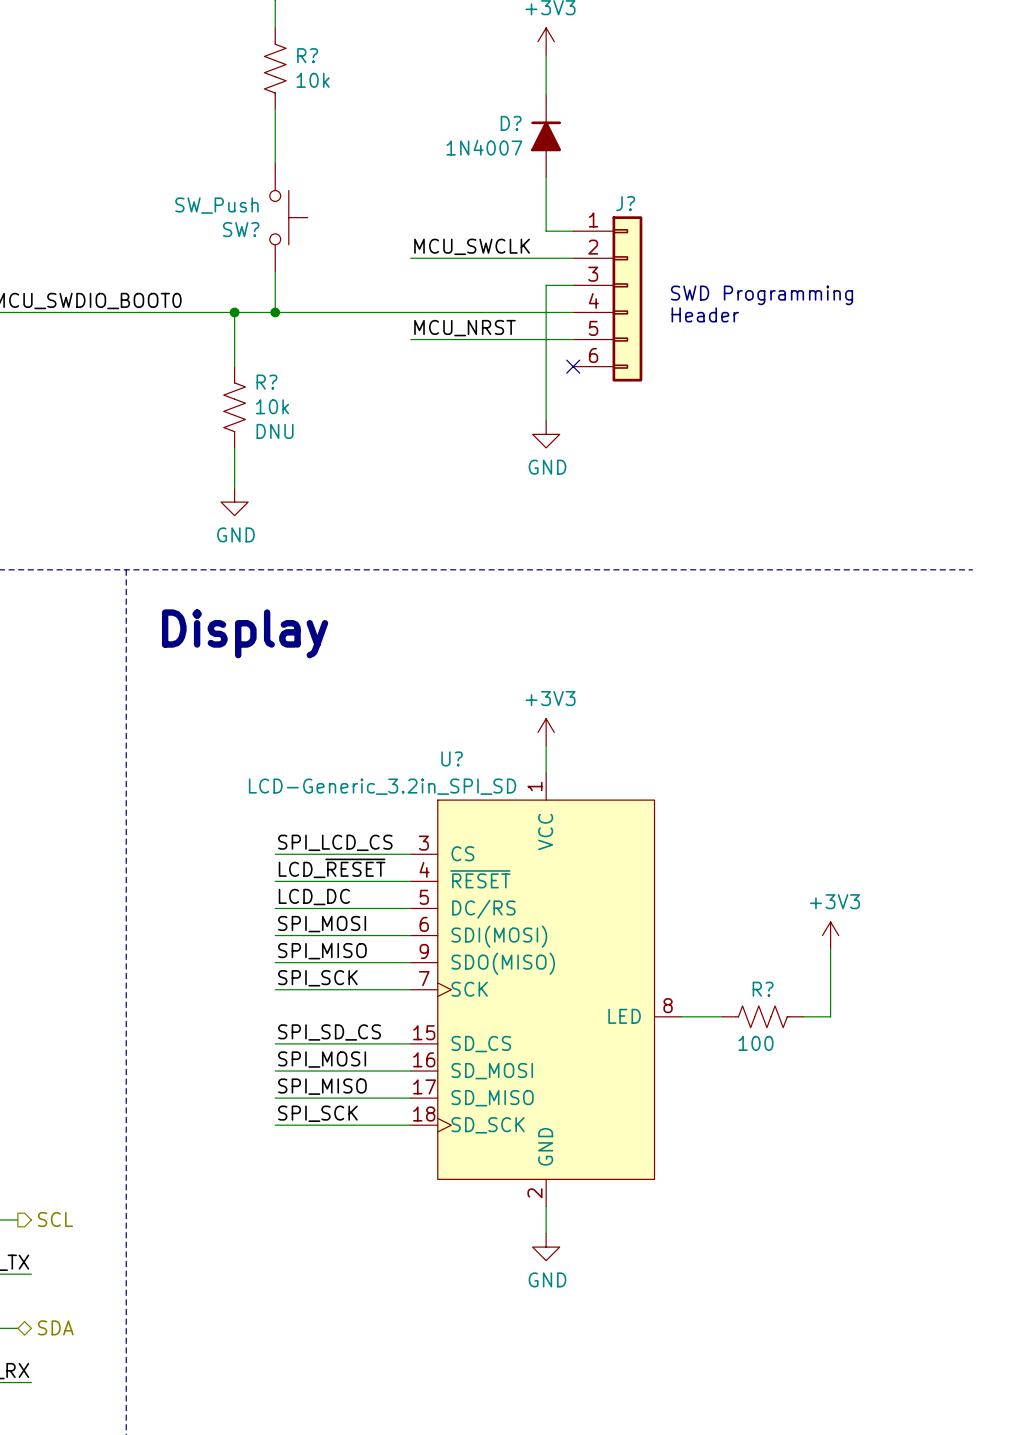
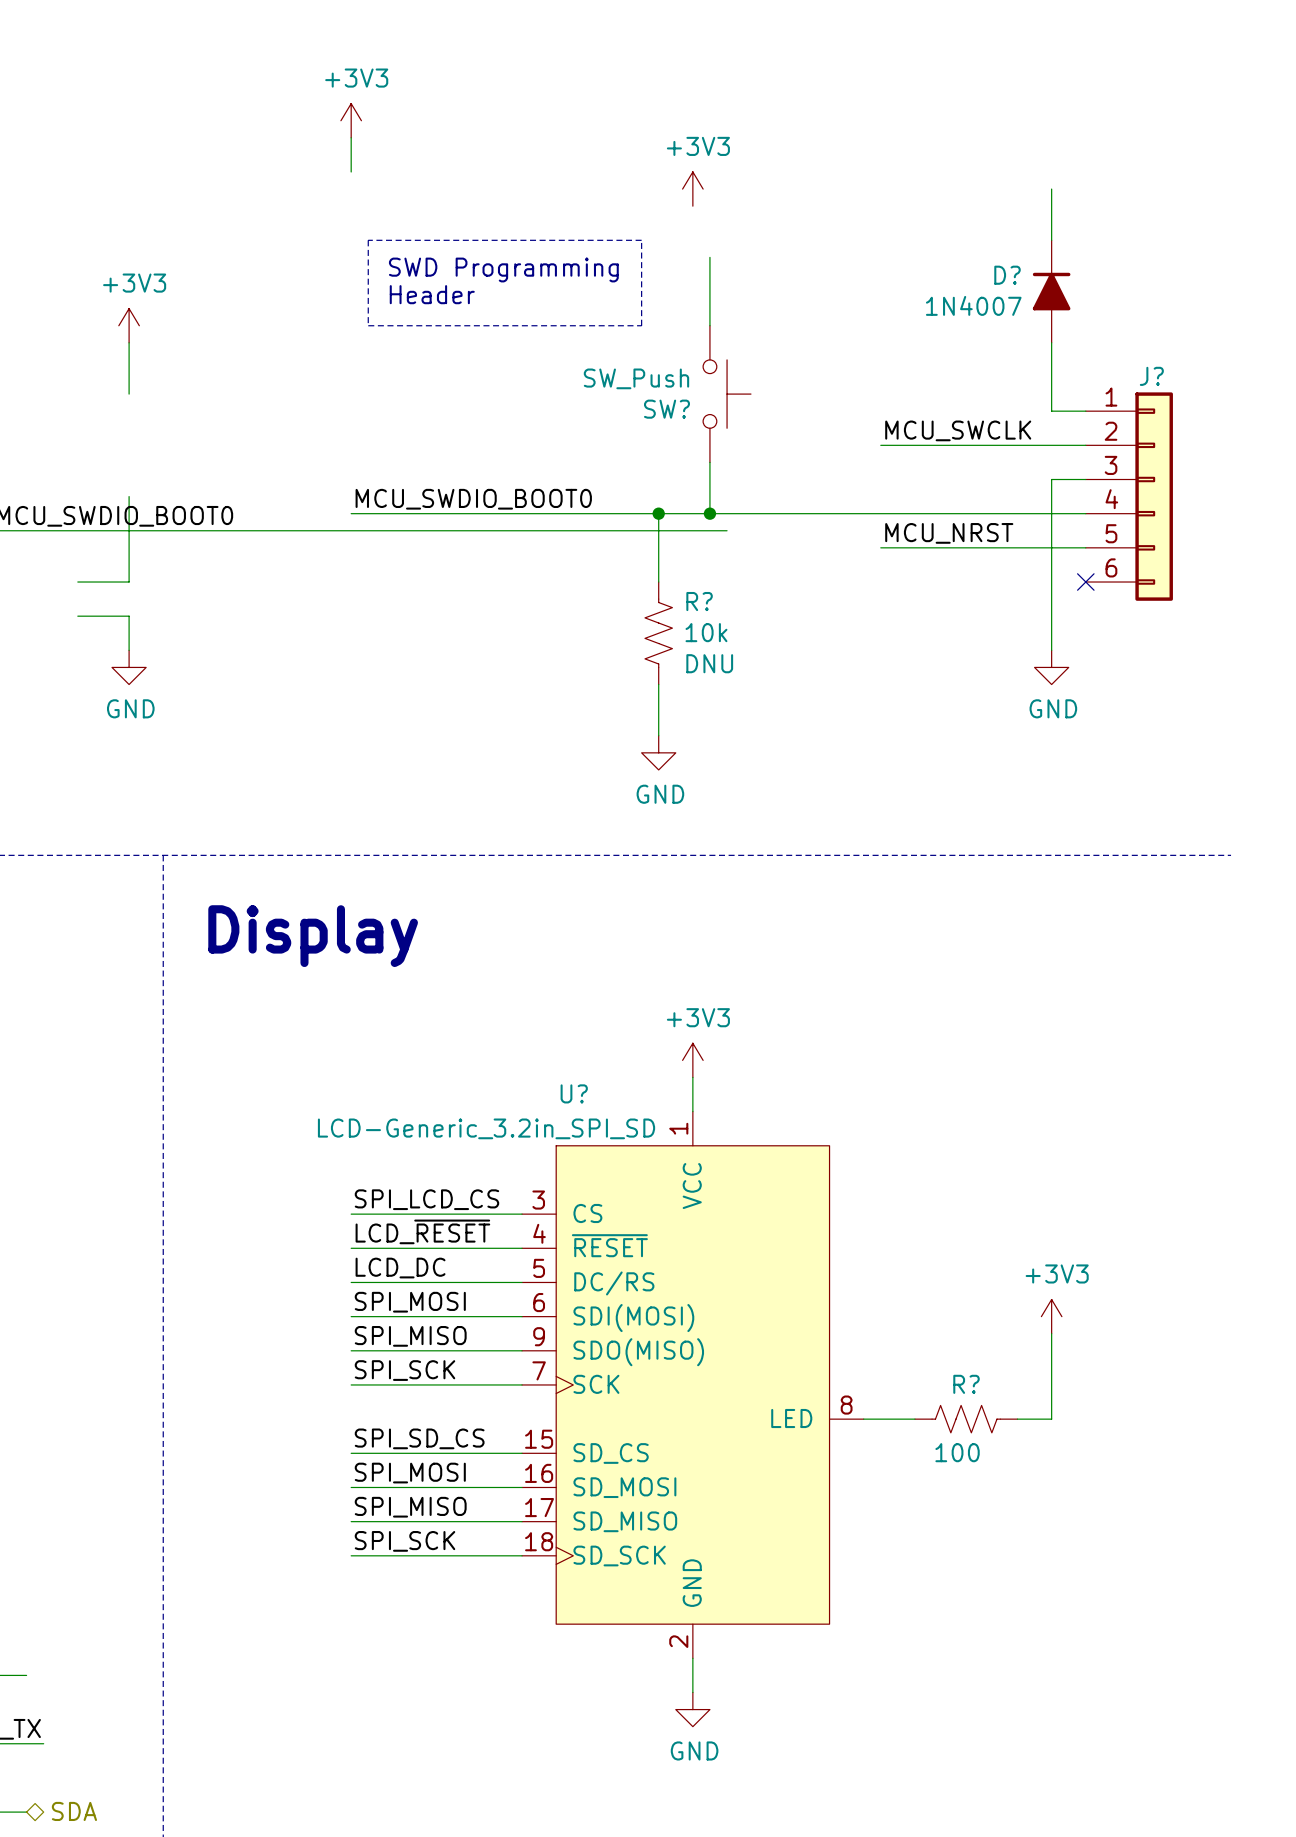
wire: none -> (1051, 189) (1051, 240)
wire: (546, 55) (546, 95) -> (709, 462) (709, 513)
R?: 10k (275, 68) -> none
line: none -> (368, 240) (641, 240) (641, 325) (368, 325) (368, 240)
wire: none -> (709, 257) (709, 325)
text: none -> SWD Programming (503, 270)
wire: (275, 109) (275, 163) -> none
D?: none -> 1N4007 (1051, 291)
text: none -> Header (432, 294)
D?: 1N4007 (546, 136) -> none
power symbol: none -> +3V3 (129, 325)
wire: none -> (1051, 342) (1051, 411) (1085, 411)
wire: (546, 177) (546, 231) (573, 231) -> none
SW?: none -> SW_Push (727, 394)
SW?: SW_Push (288, 217) -> none
label: none -> MCU_SWCLK (958, 430)
wire: none -> (880, 445) (1085, 445)
label: MCU_SWCLK (472, 246) -> none
wire: (410, 258) (573, 258) -> none
wire: (275, 271) (275, 312) -> (129, 342) (129, 394)
wire: none -> (1085, 479) (1051, 479) (1051, 650)
wire: none -> (129, 496) (129, 582) (77, 582)
wire: (573, 285) (546, 285) (546, 420) -> none
J?: none -> (1129, 496)
label: none -> MCU_SWDIO_BOOT0 (473, 499)
text: SWD Programming (762, 295) -> none
wire: none -> (351, 513) (1085, 513)
wire: none -> (658, 513) (658, 582)
junction: none -> (658, 513)
junction: none -> (709, 513)
J?: (607, 298) -> none
wire: (234, 312) (234, 366) -> none
junction: (234, 312) -> none
junction: (275, 312) -> none
text: Header (705, 314) -> none
label: none -> MCU_NRST (949, 533)
wire: none -> (880, 547) (1085, 547)
label: MCU_NRST (464, 328) -> none
wire: (410, 339) (573, 339) -> none
no-connect mark: none -> (1085, 582)
no-connect mark: (573, 366) -> none
wire: none -> (77, 616) (129, 616) (129, 650)
R?: none -> 10k (658, 633)
R?: 10k (234, 407) -> none
power symbol: none -> GND (129, 667)
power symbol: none -> GND (1051, 667)
wire: none -> (658, 684) (658, 735)
power symbol position: GND (546, 434) -> GND (658, 752)
wire: (234, 447) (234, 488) -> none
power symbol: GND (234, 502) -> none
hierarchical label: SCL (55, 1219) -> none

